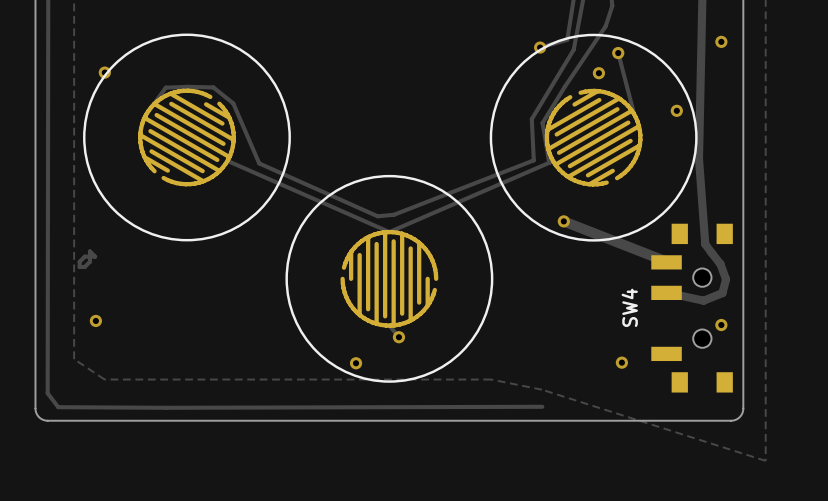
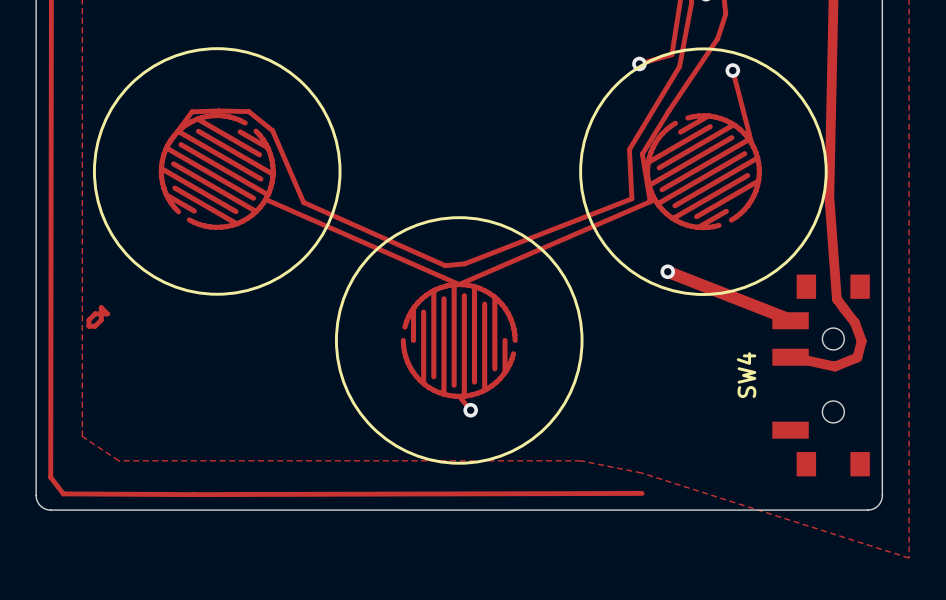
via: (721, 41) -> none
via: (104, 72) -> none
via: (598, 73) -> none
via: (676, 110) -> none
via: (95, 320) -> none
via: (721, 325) -> none
via: (621, 362) -> none
via: (356, 363) -> none

